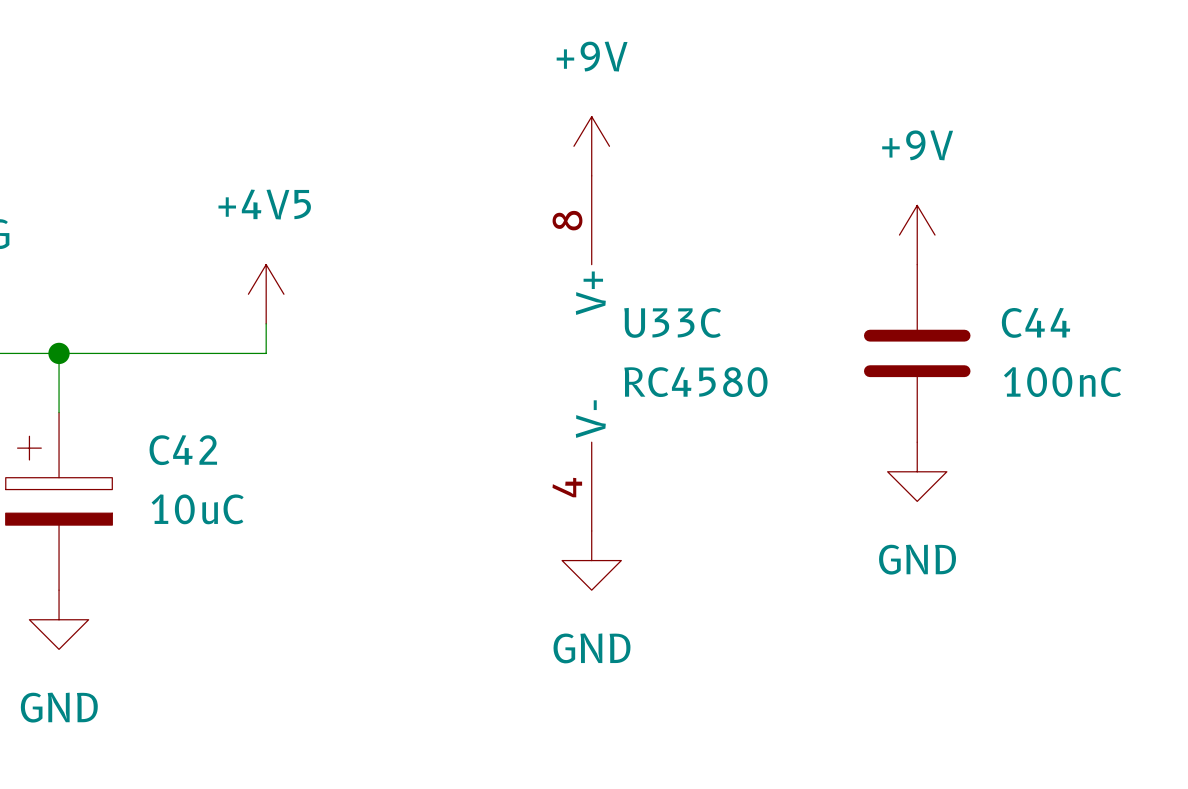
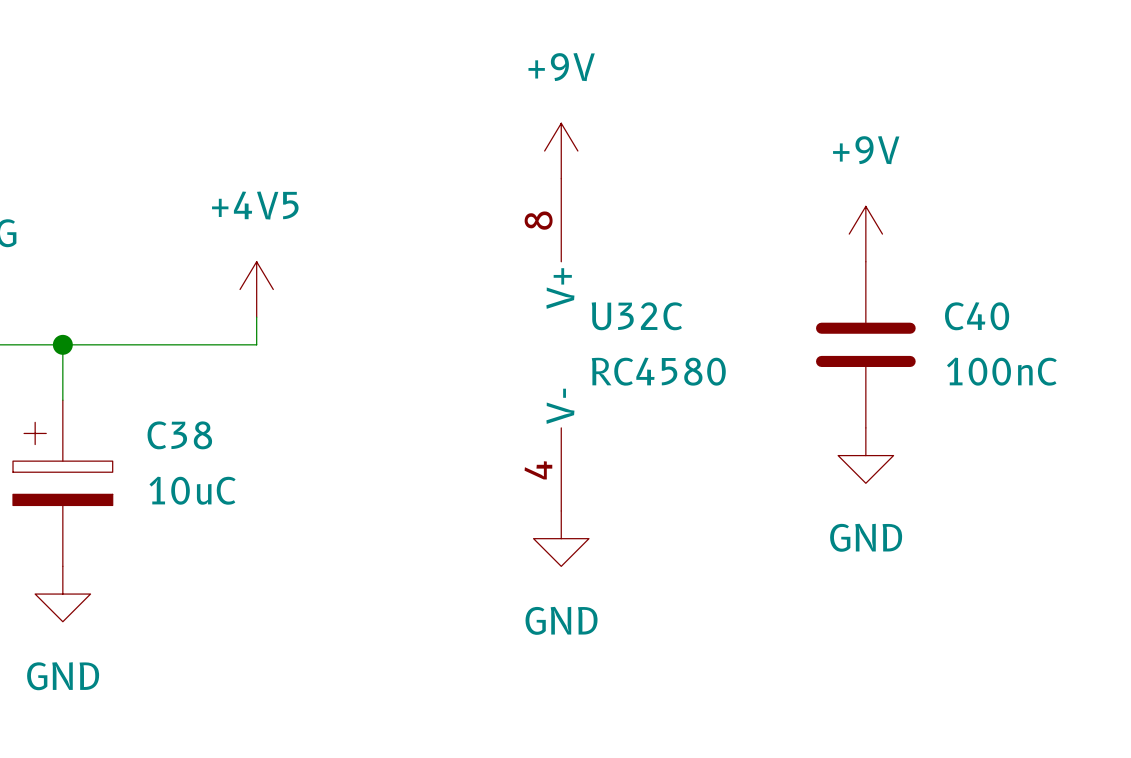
U33C name: U33C (672, 322) -> U32C (636, 316)
C44 name: C44 (1036, 322) -> C40 (977, 316)
C42 name: C42 (183, 450) -> C38 (179, 435)

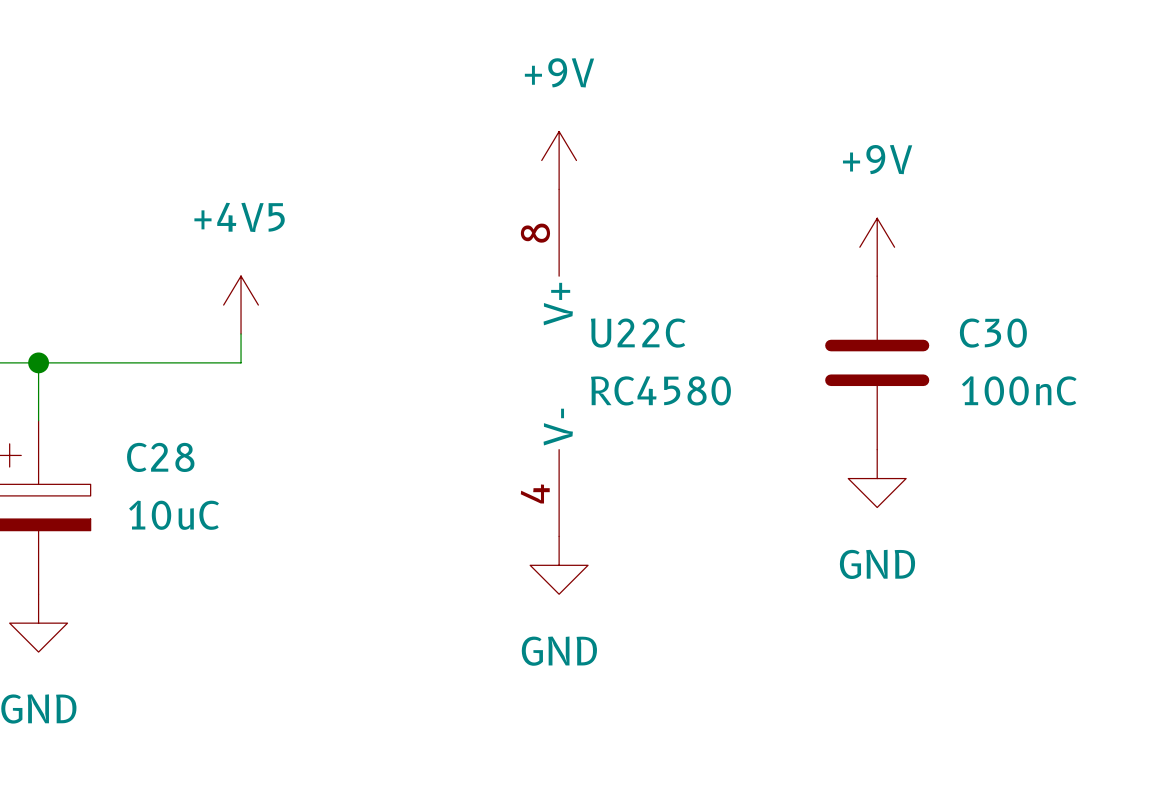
U32C name: U32C (636, 316) -> U22C (638, 333)
C40 name: C40 (977, 316) -> C30 (993, 333)
C38 name: C38 (179, 435) -> C28 (160, 457)

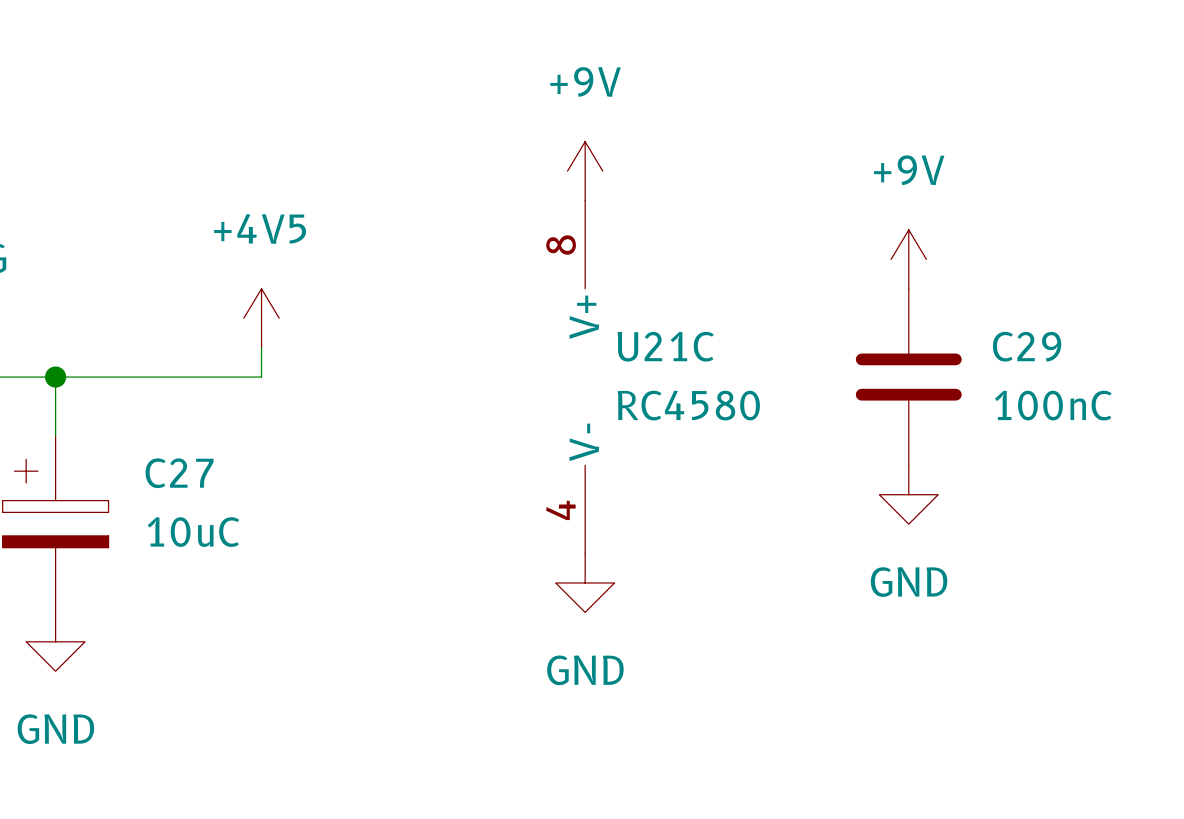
U22C name: U22C (638, 333) -> U21C (665, 346)
C30 name: C30 (993, 333) -> C29 (1027, 346)
C28 name: C28 (160, 457) -> C27 (179, 473)

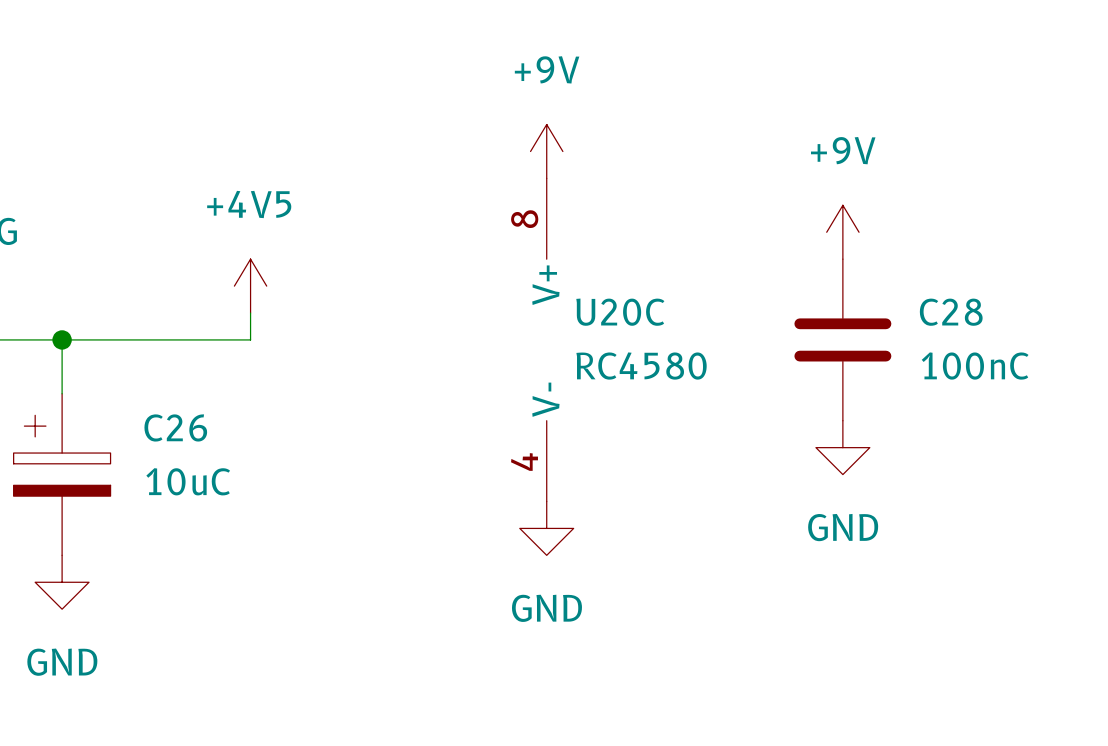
U21C name: U21C (665, 346) -> U20C (620, 312)
C29 name: C29 (1027, 346) -> C28 (951, 312)
C27 name: C27 (179, 473) -> C26 (175, 427)

